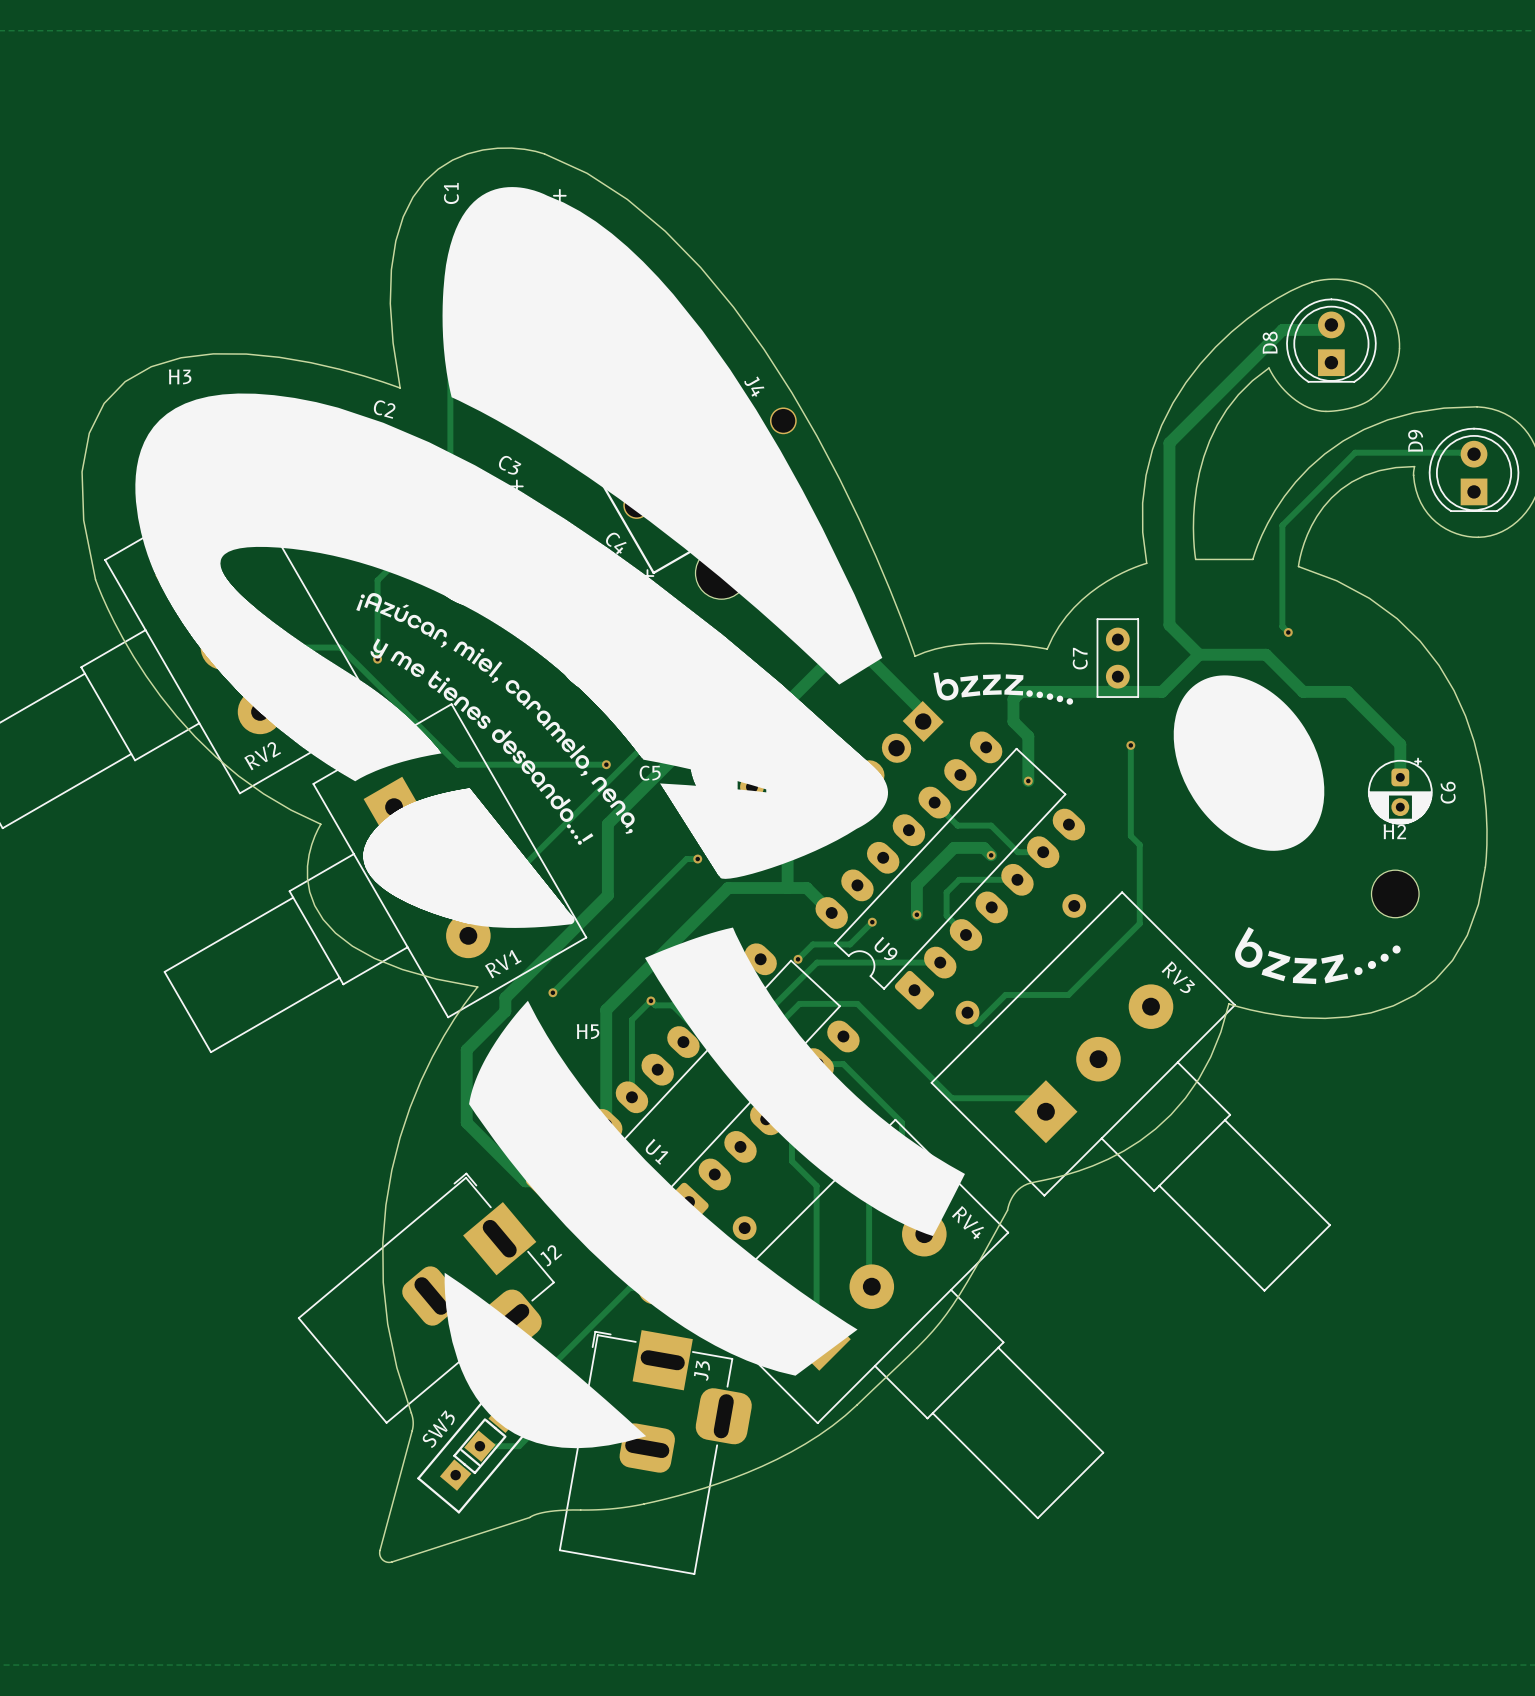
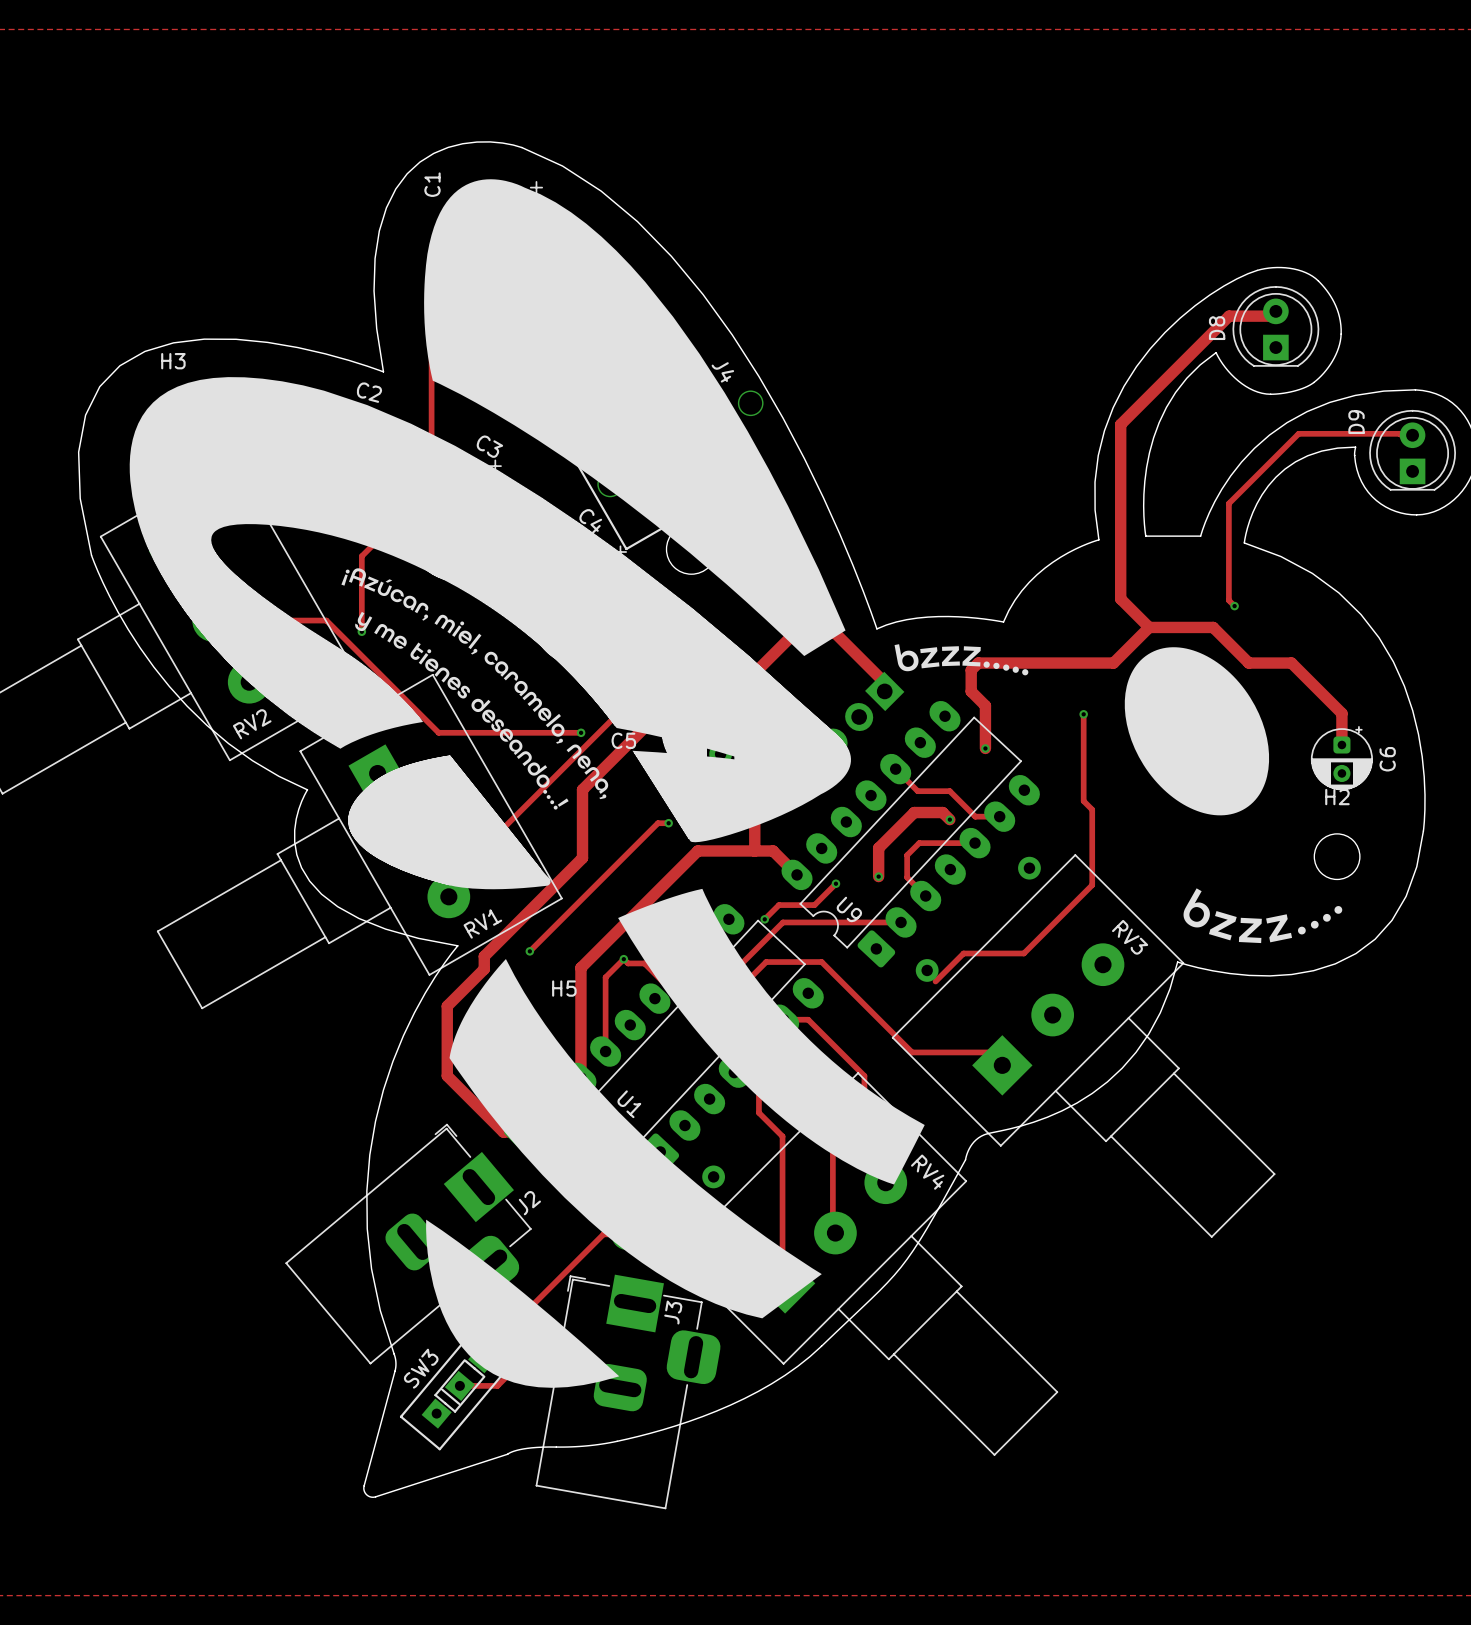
C7: (1117, 658) -> none

